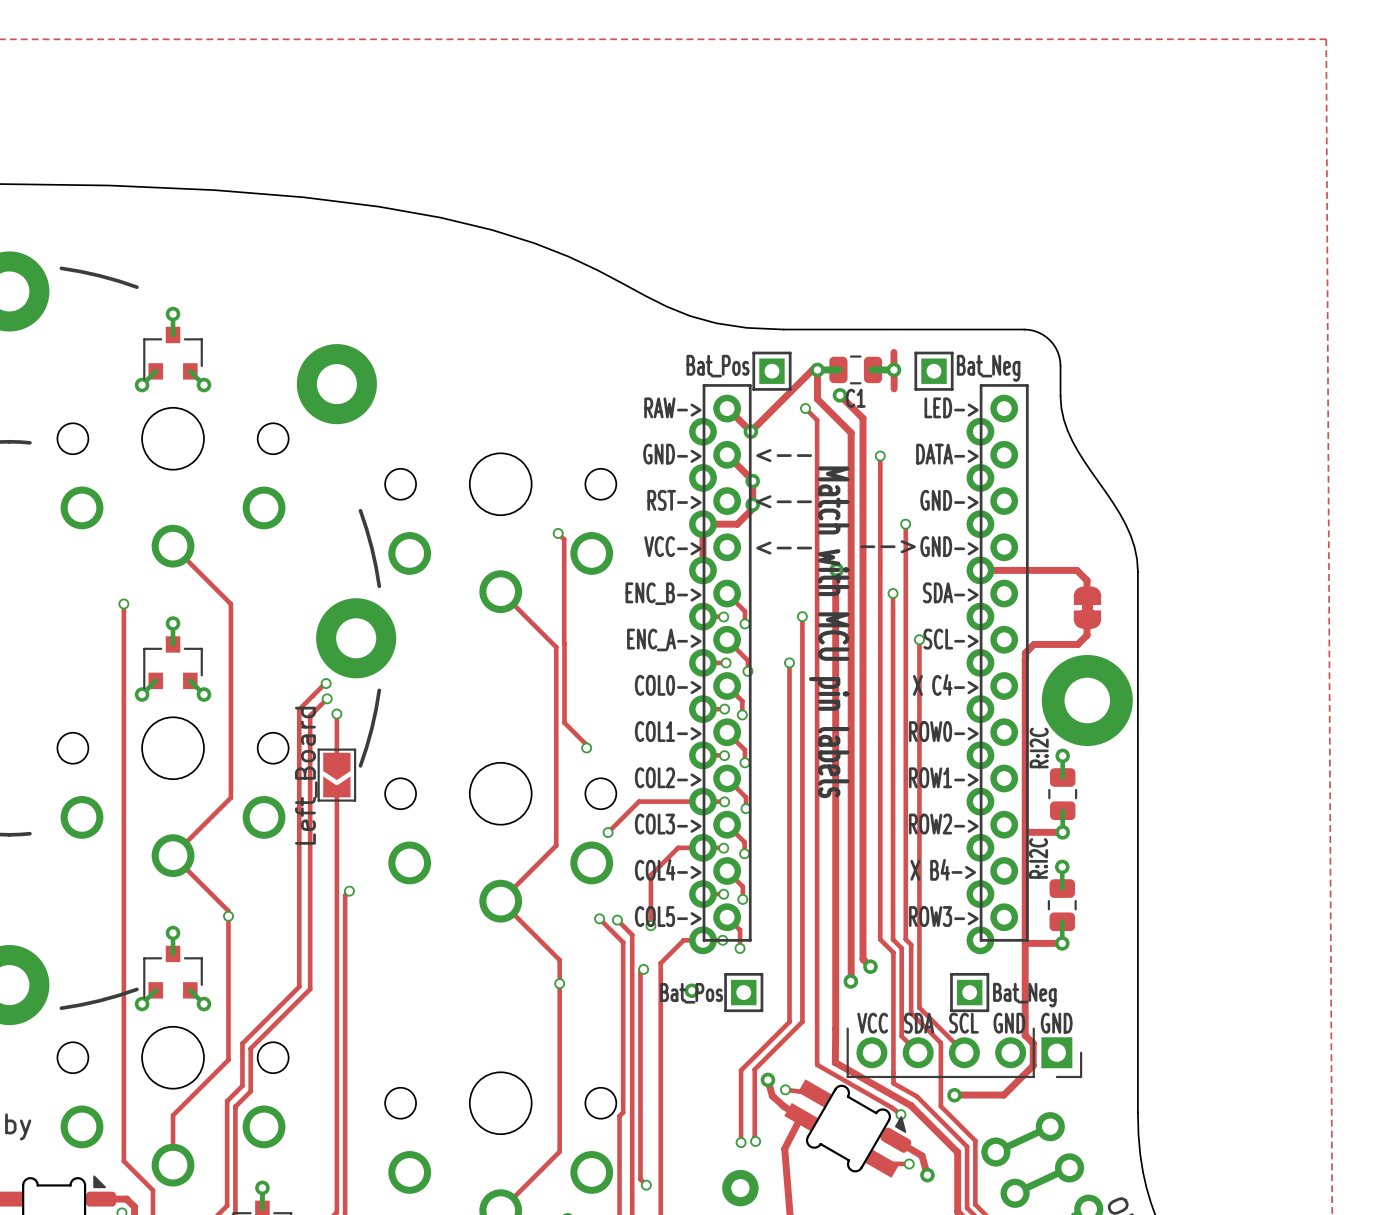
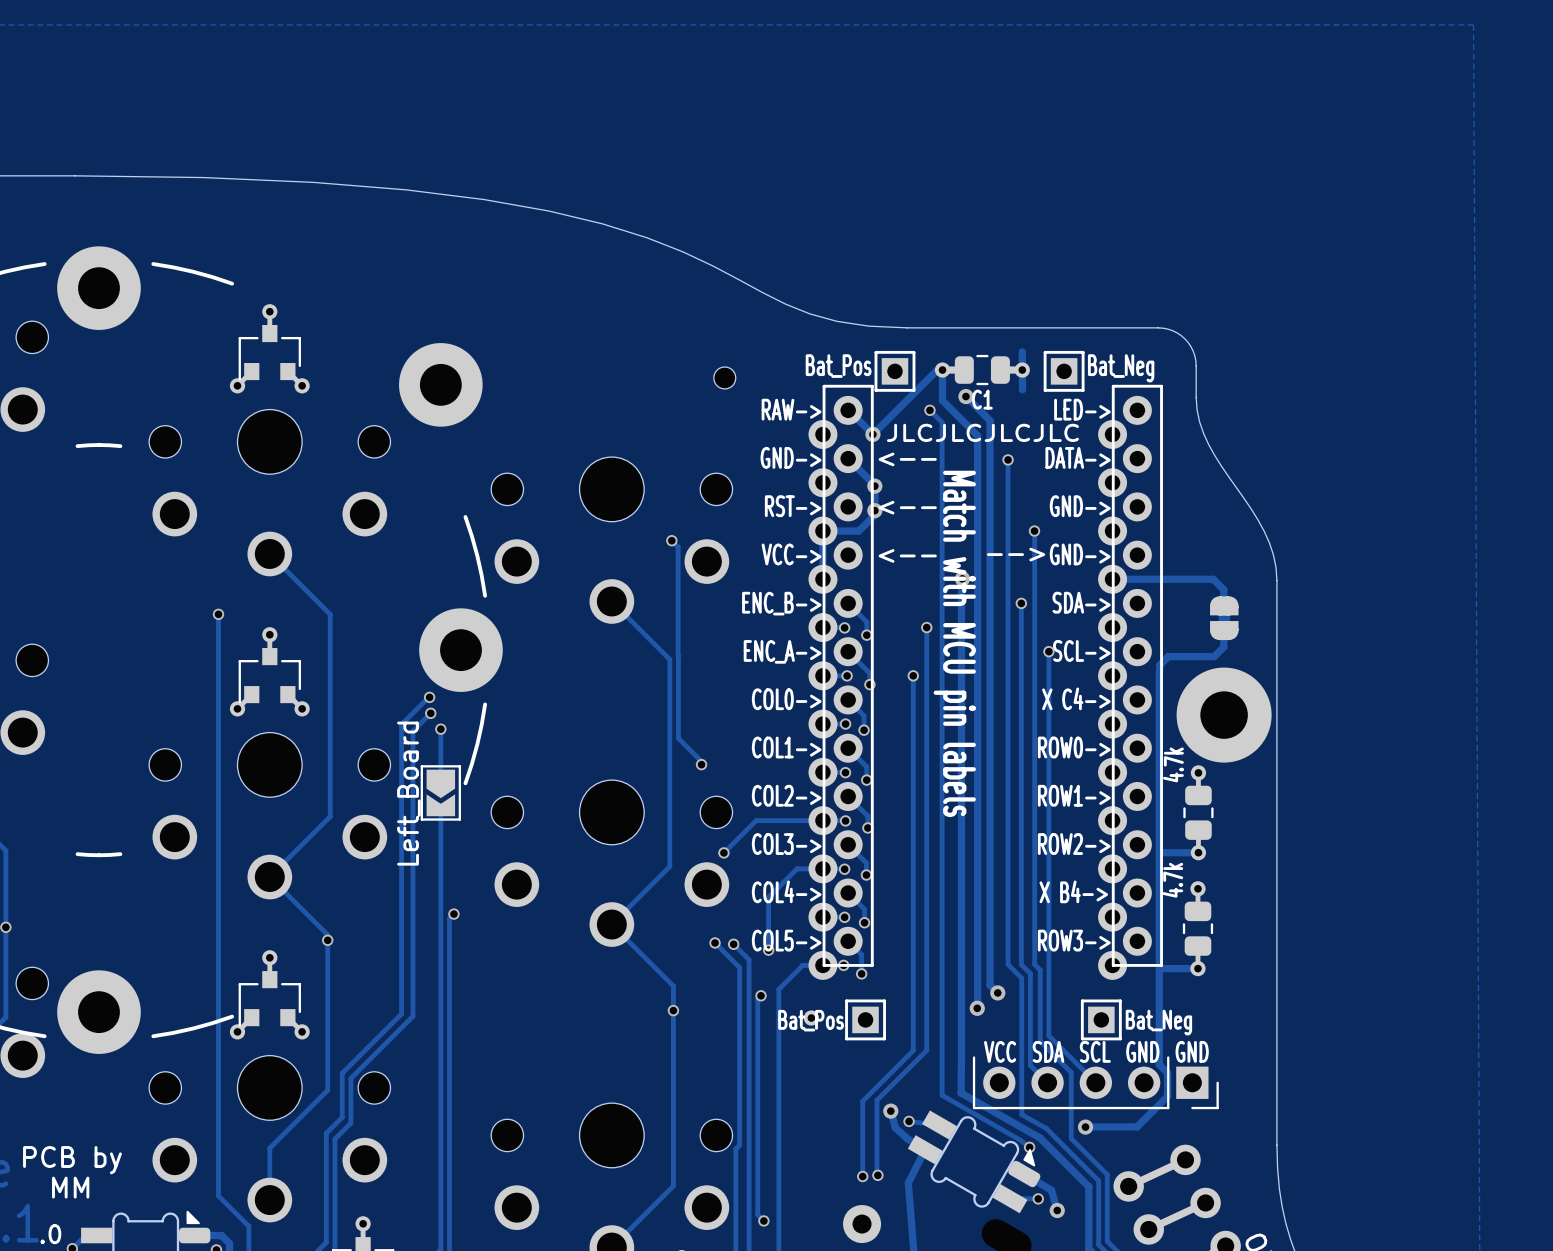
part: none -> (724, 377)
text: none -> JLCJLCJLCJLC (982, 432)
part value: R:I2C (1039, 747) -> 4.7k (1173, 764)
part value: R:I2C (1038, 858) -> 4.7k (1172, 880)

